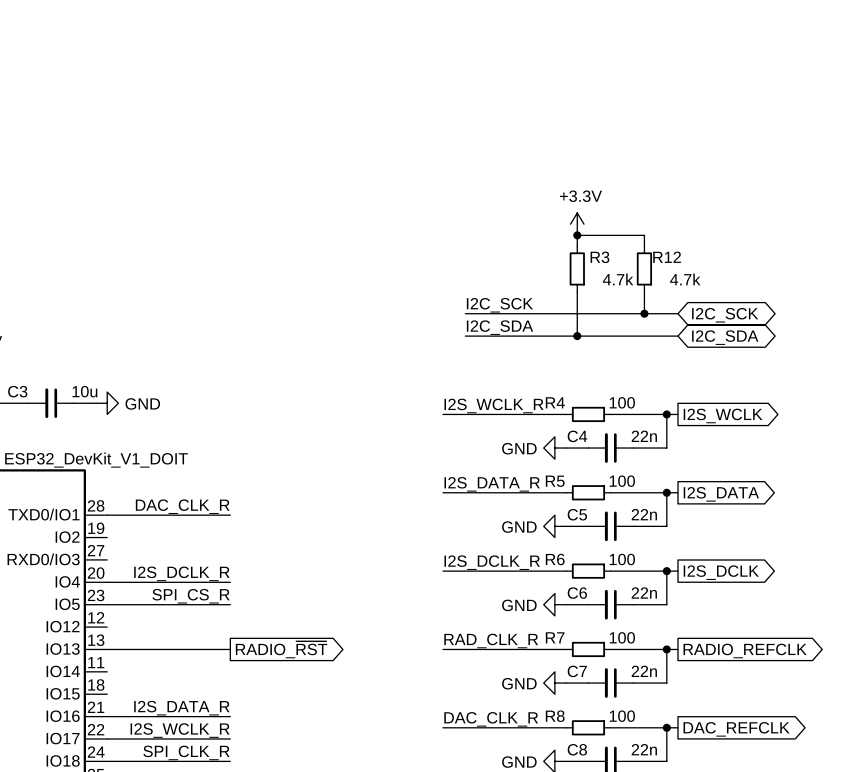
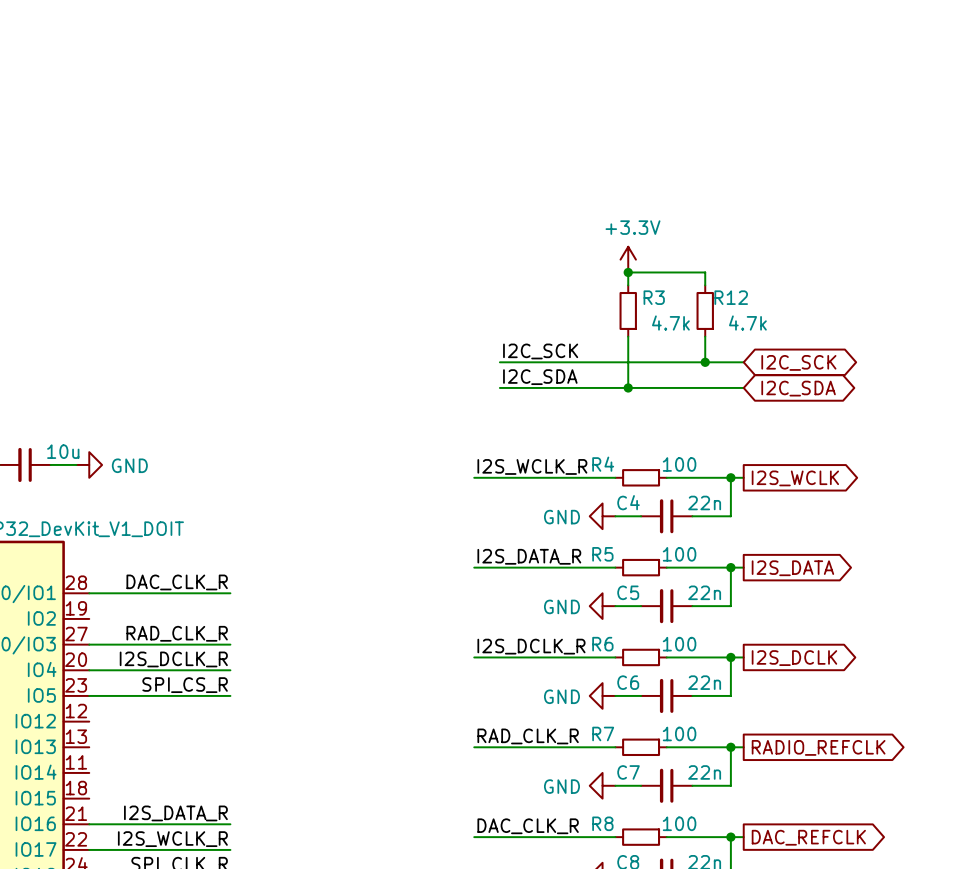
label: none -> RAD_CLK_R (177, 633)
wire: (107, 649) (230, 649) -> (89, 644) (230, 644)
global label: RADIO_~{RST} (281, 649) -> none

